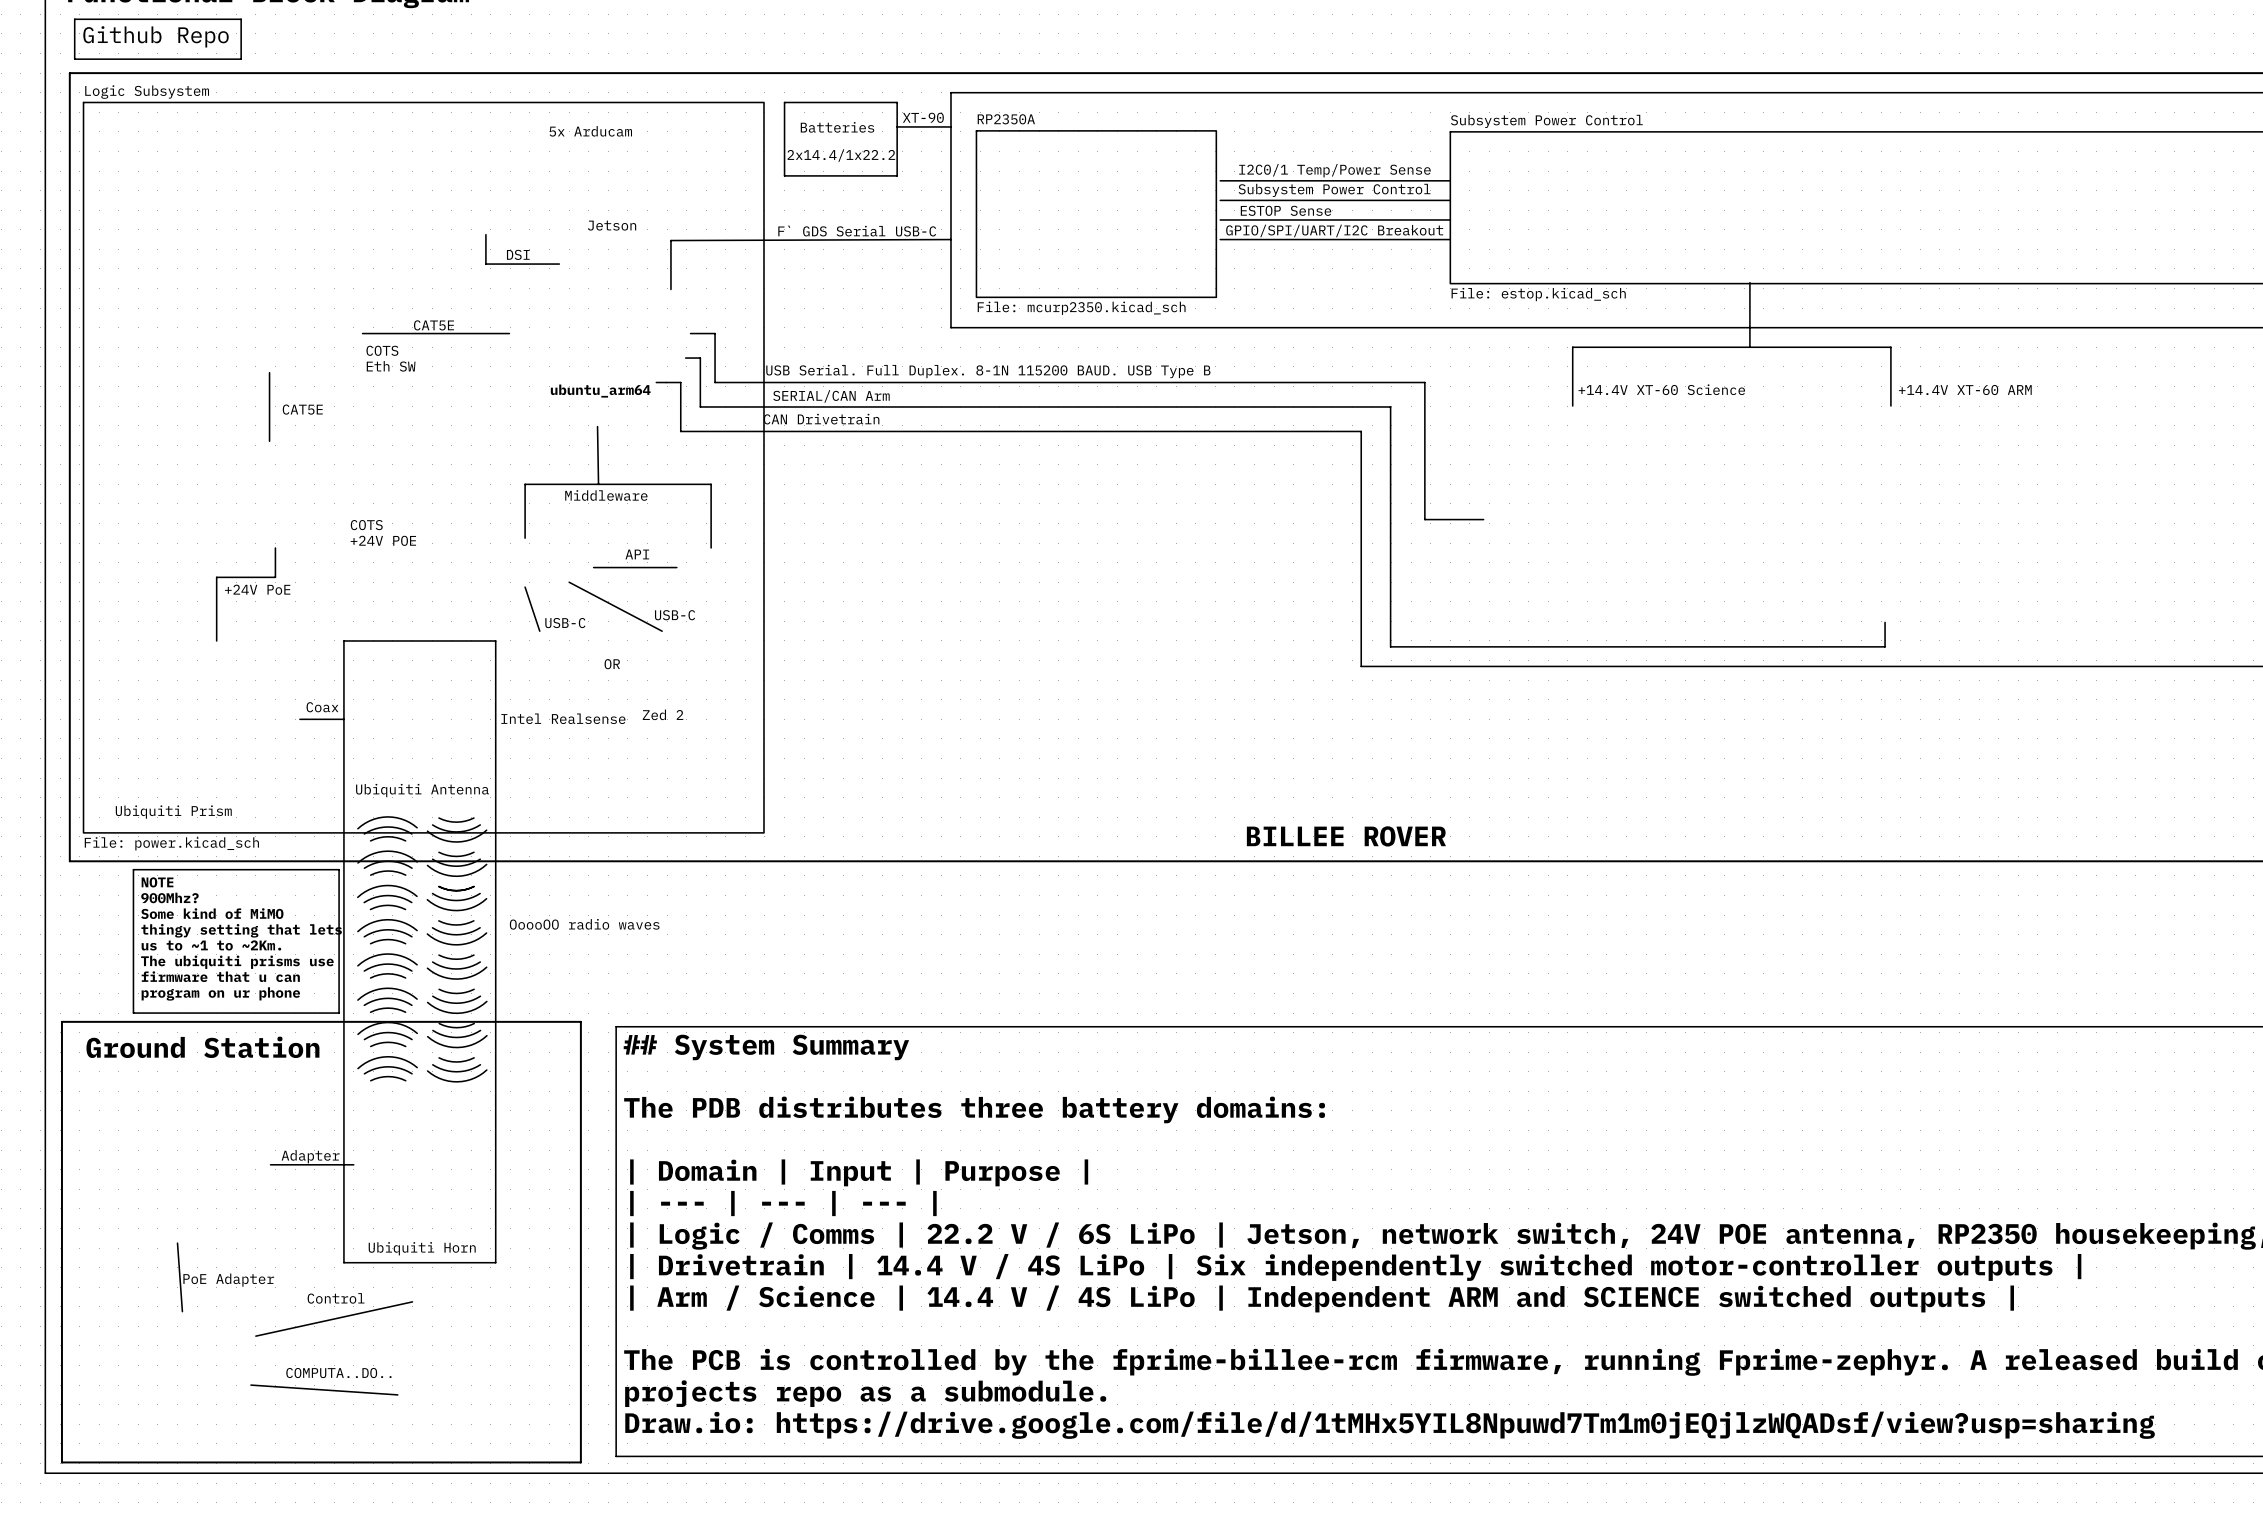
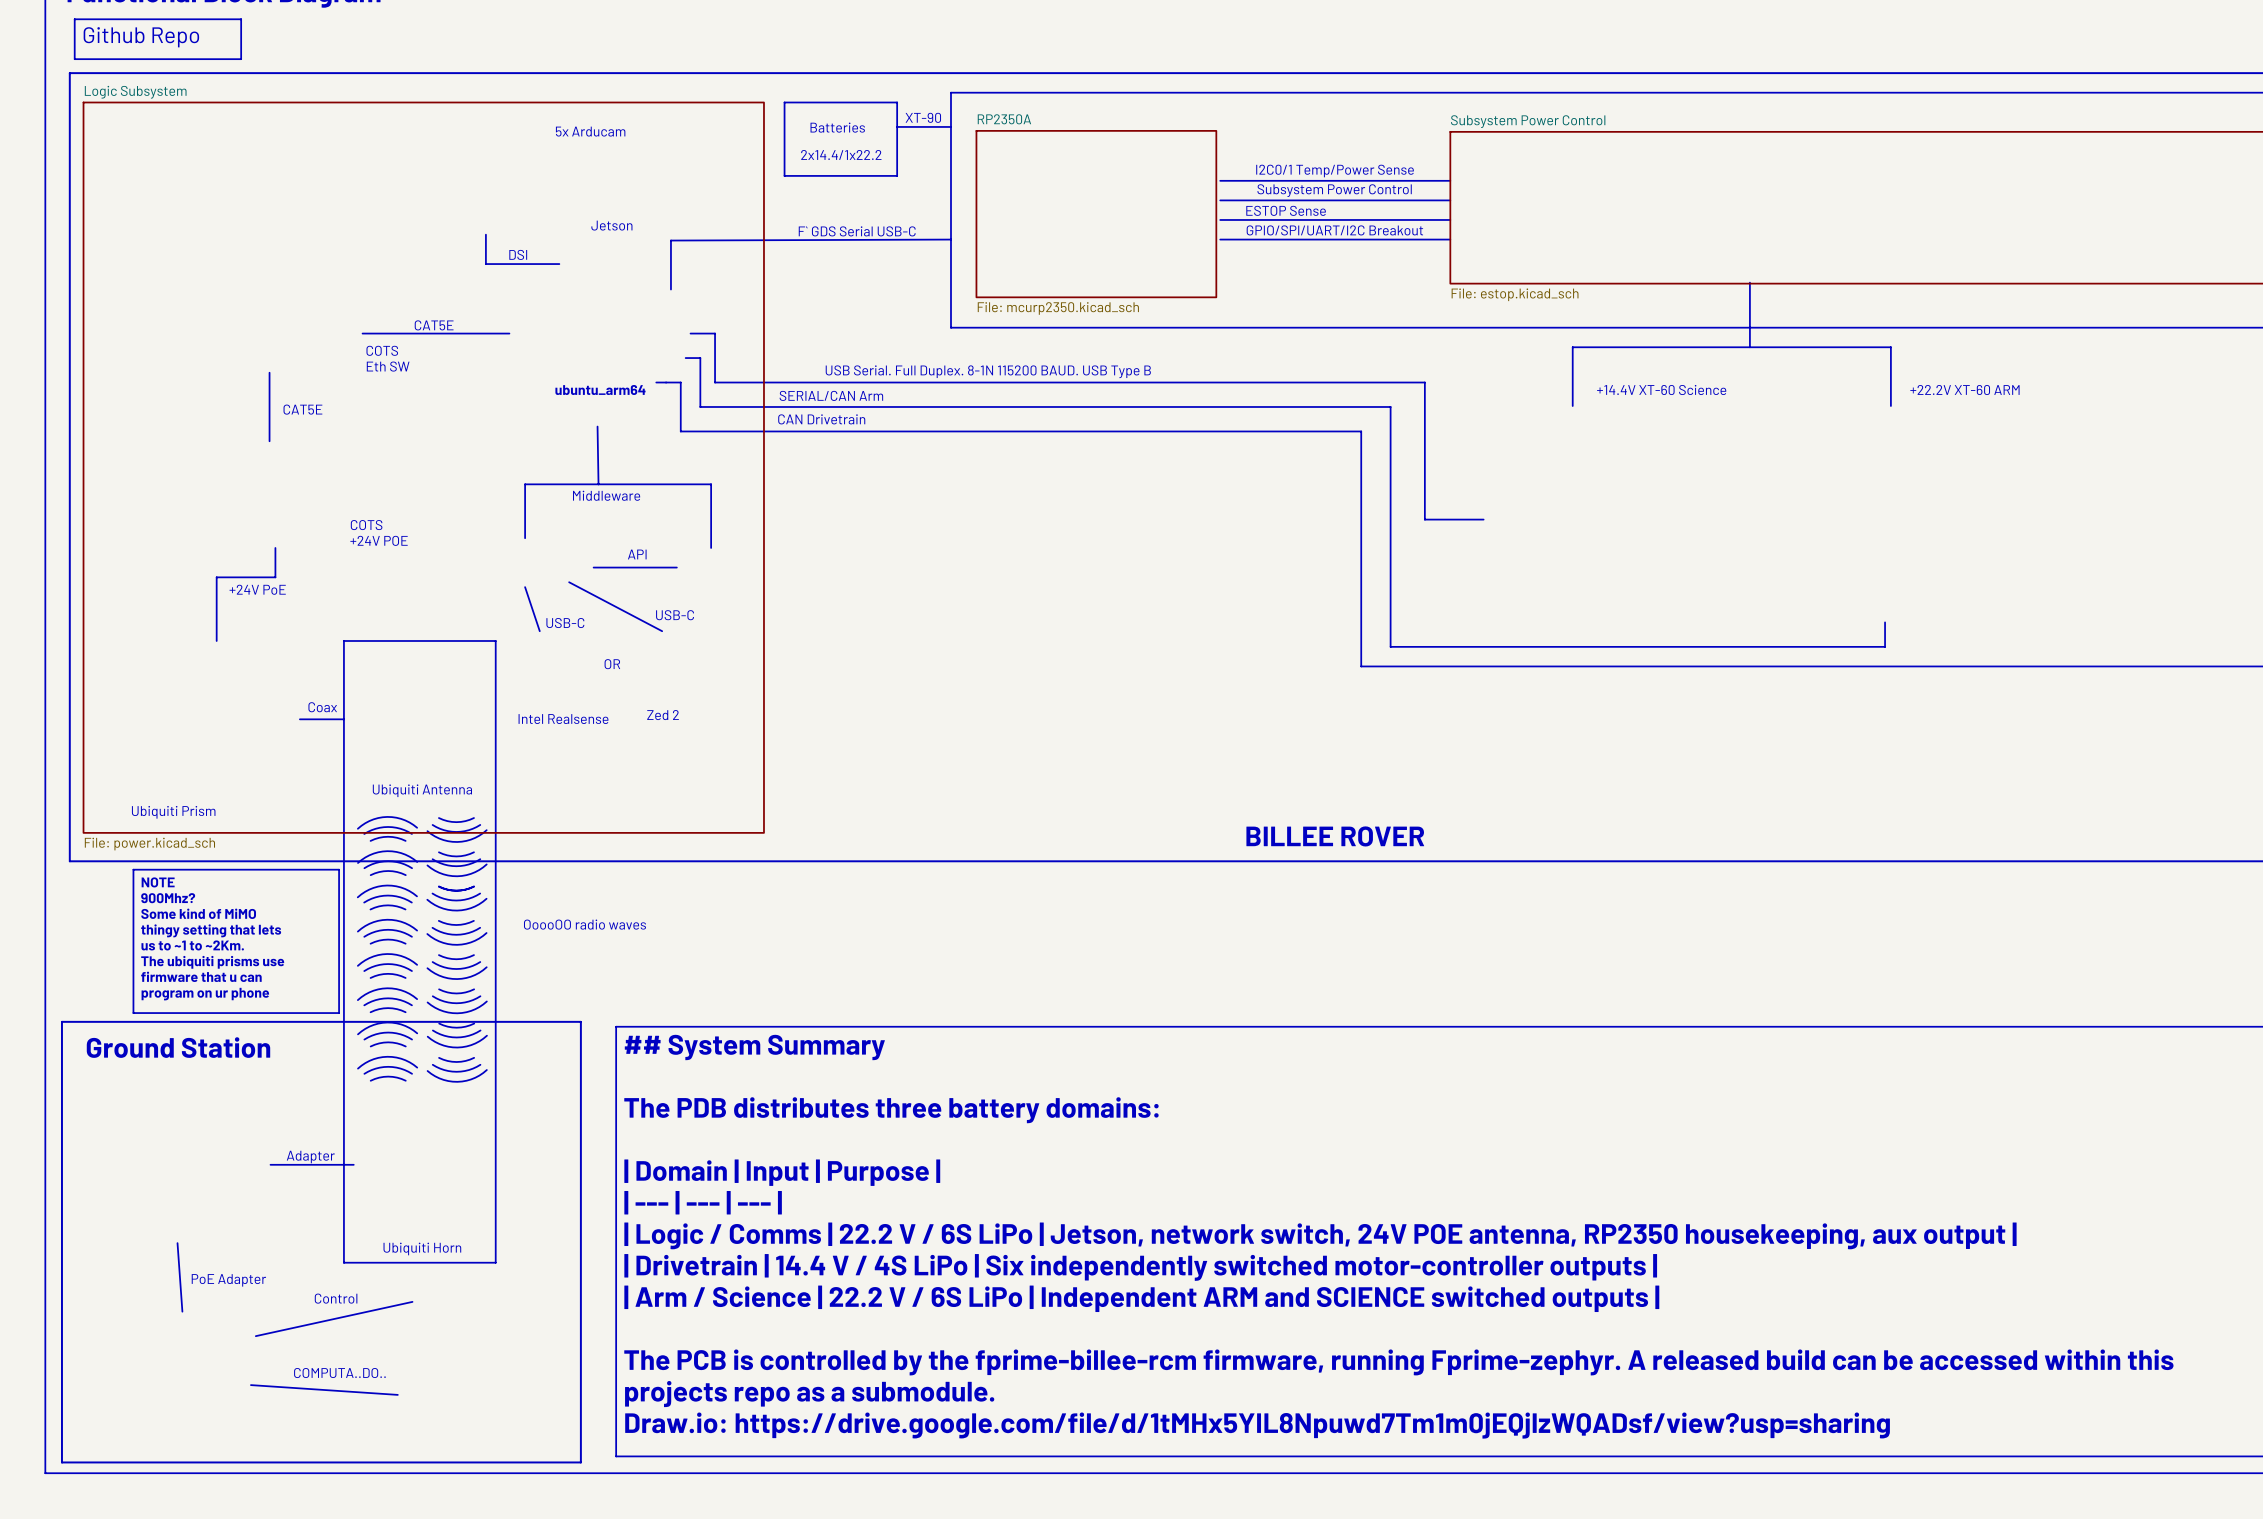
text: +14.4V XT-60 ARM (1965, 390) -> +22.2V XT-60 ARM (1964, 390)
text: | Arm / Science | 14.4 V / 4S LiPo | Independent ARM and SCIENCE switched outputs | (1322, 1298) -> | Arm / Science | 22.2 V / 6S LiPo | Independent ARM and SCIENCE switched outputs | (1141, 1298)

